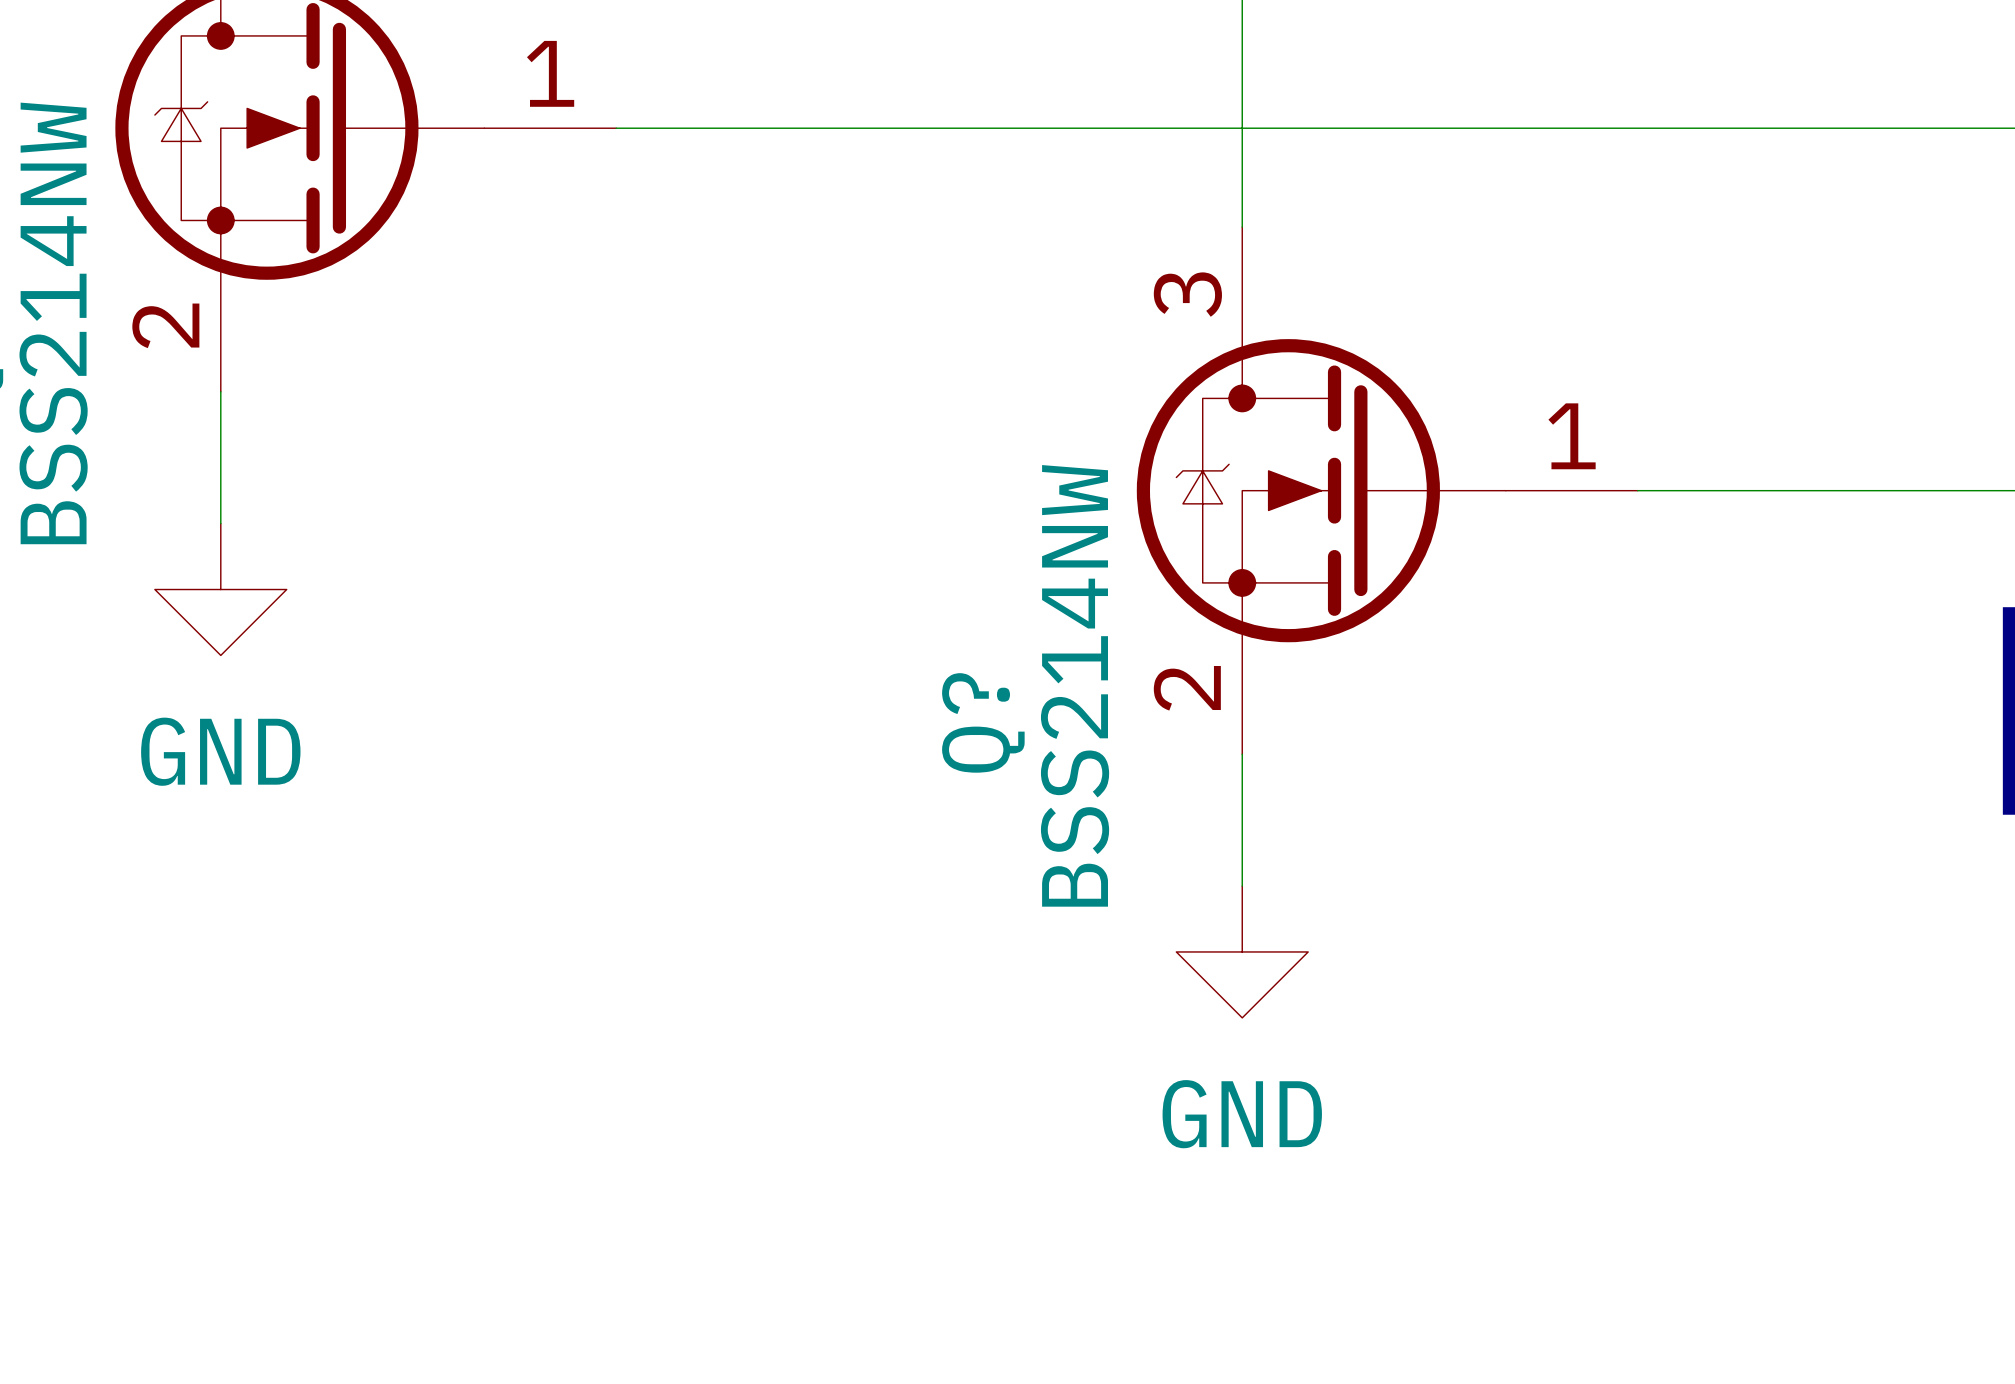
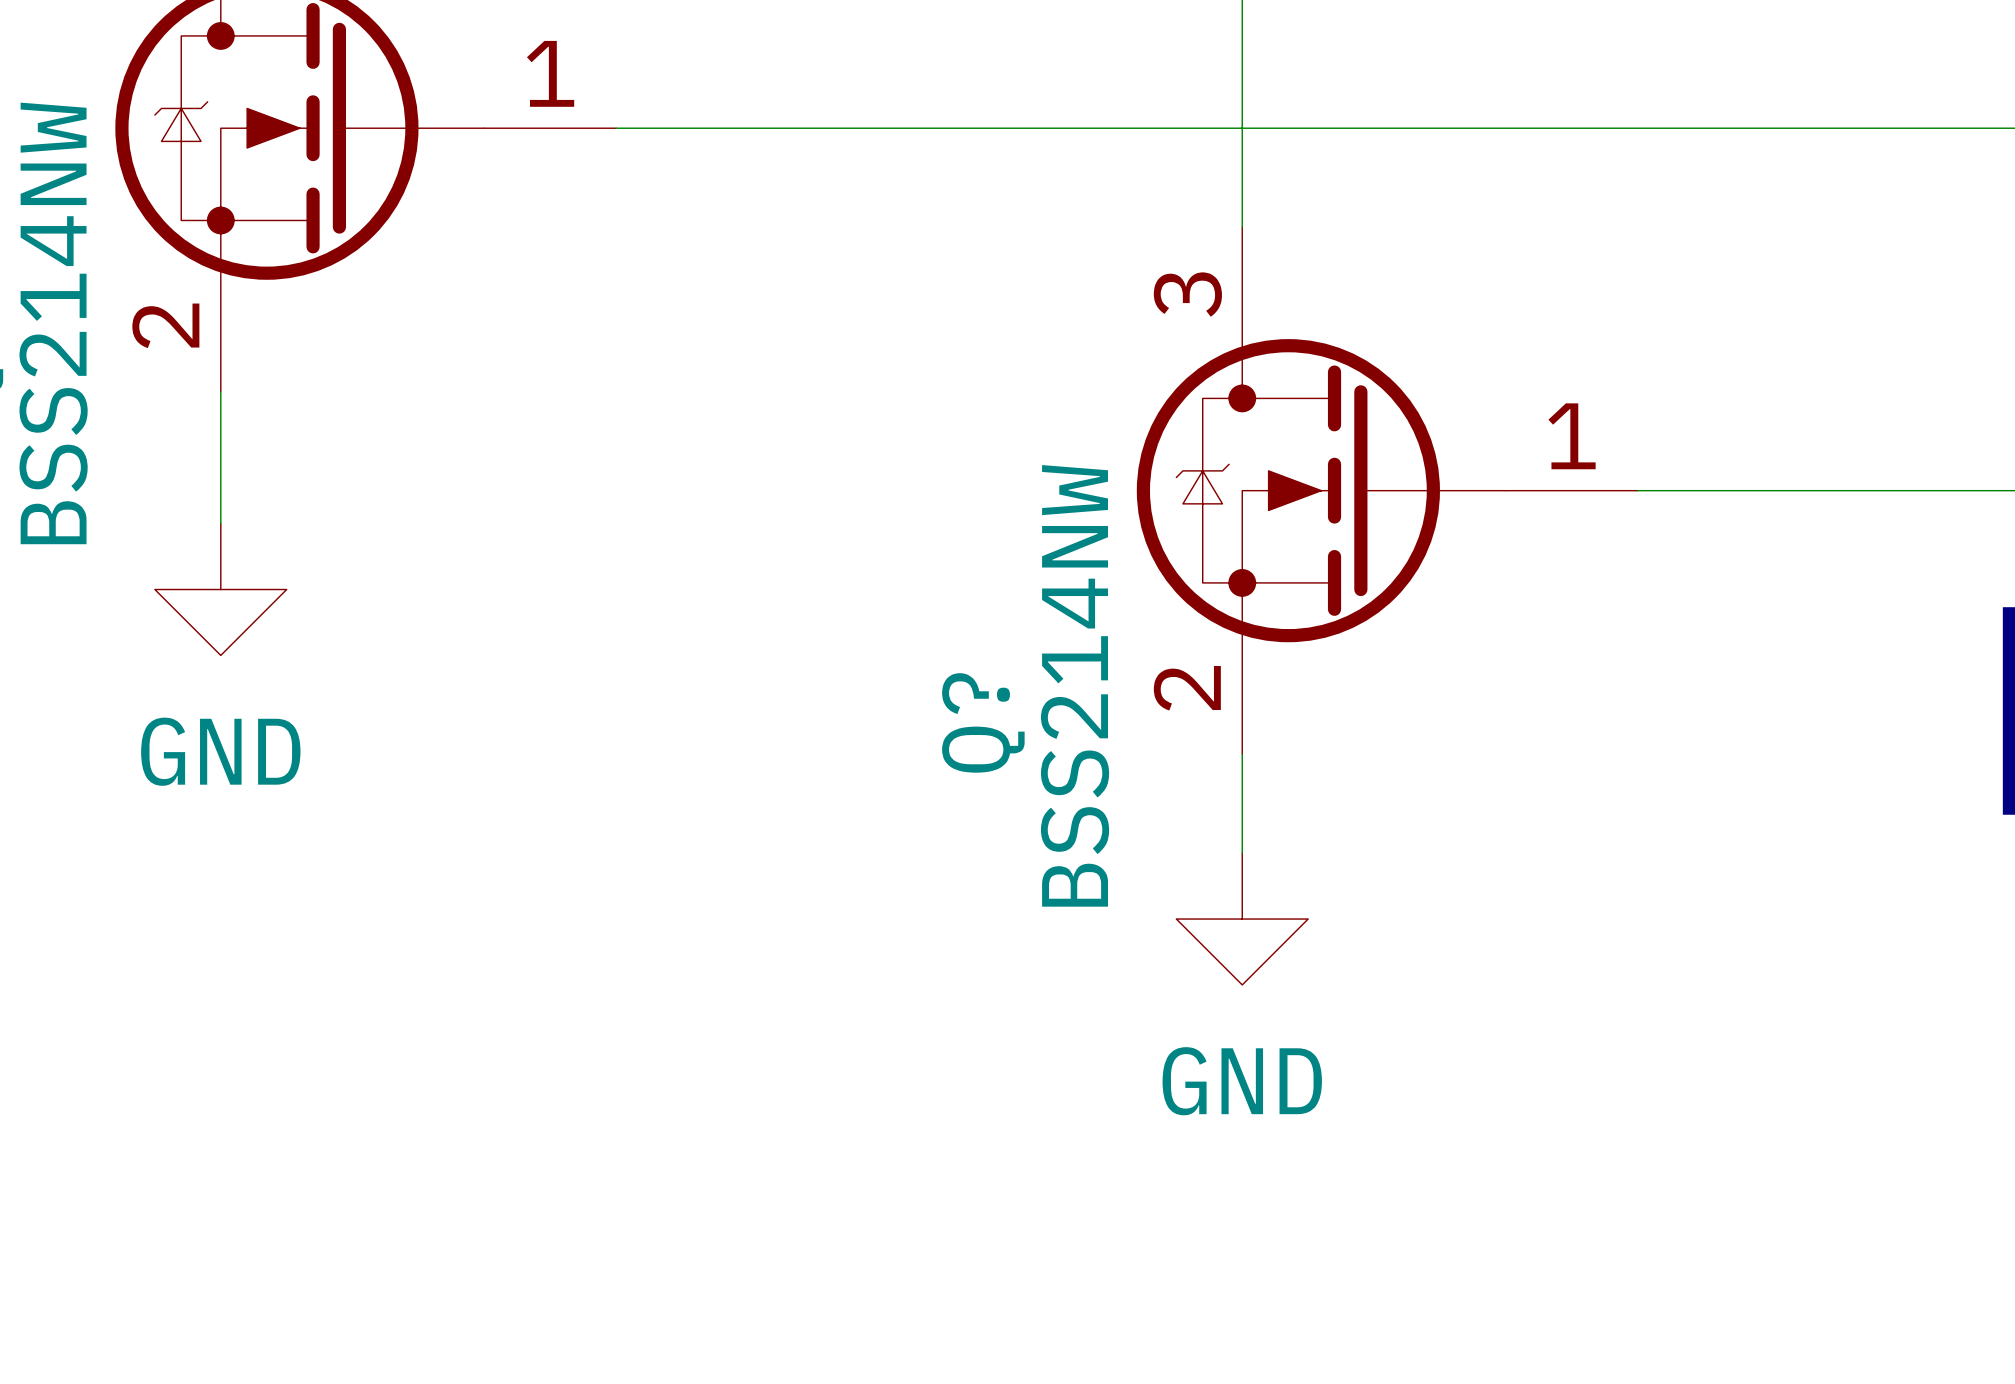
power symbol position: GND (1242, 951) -> GND (1242, 919)

